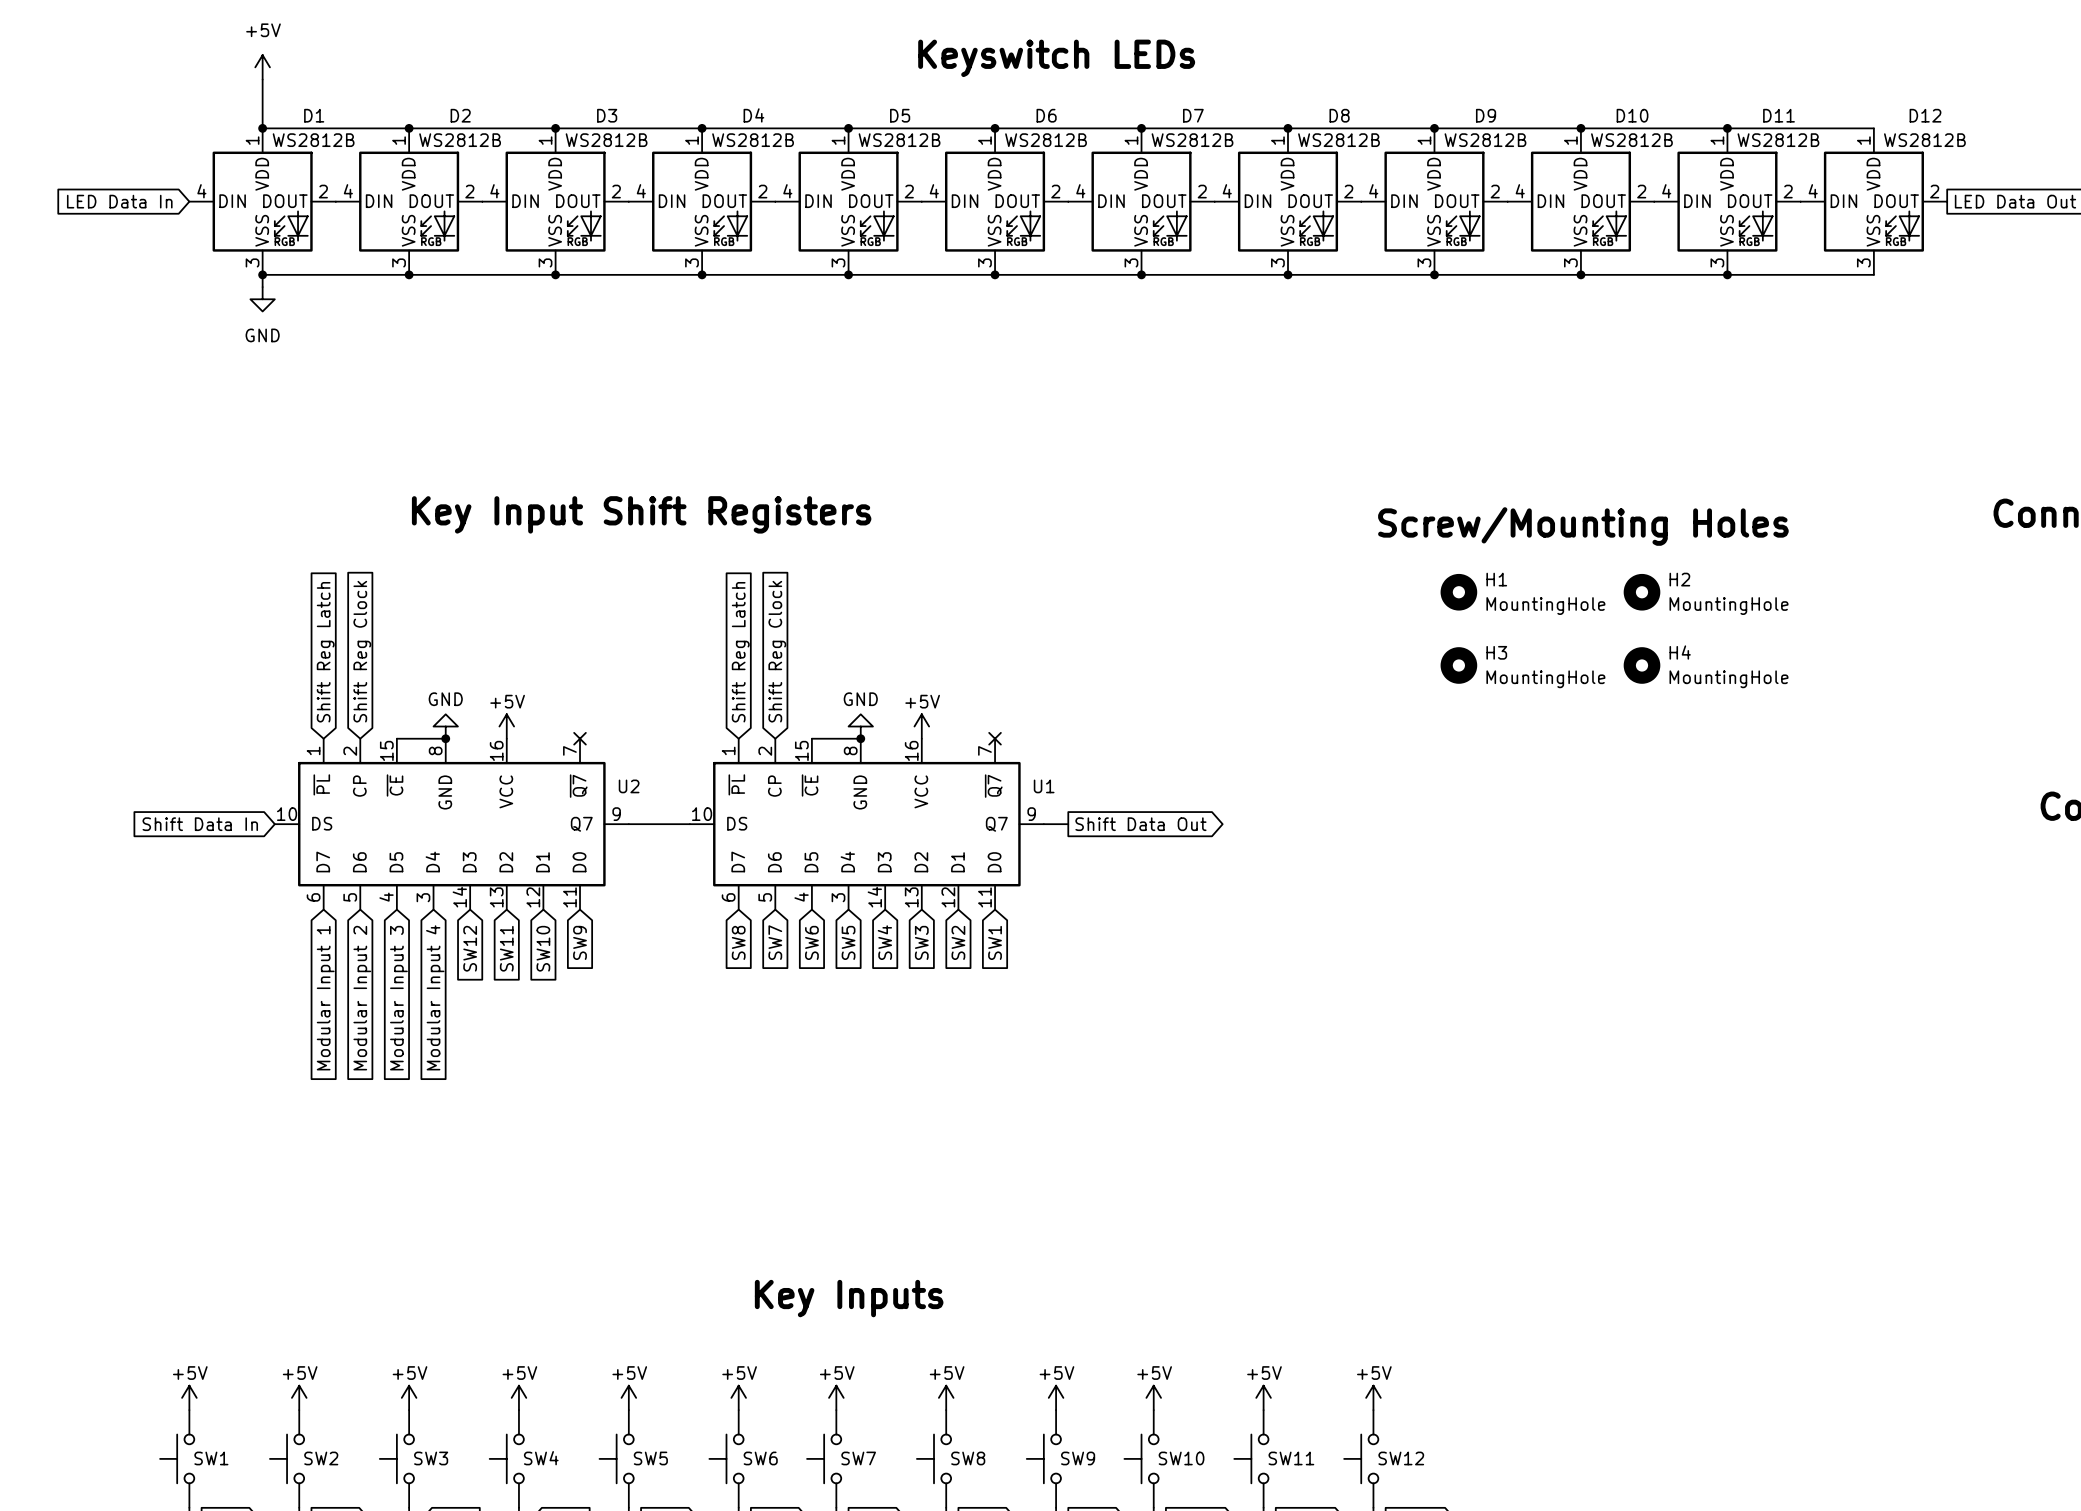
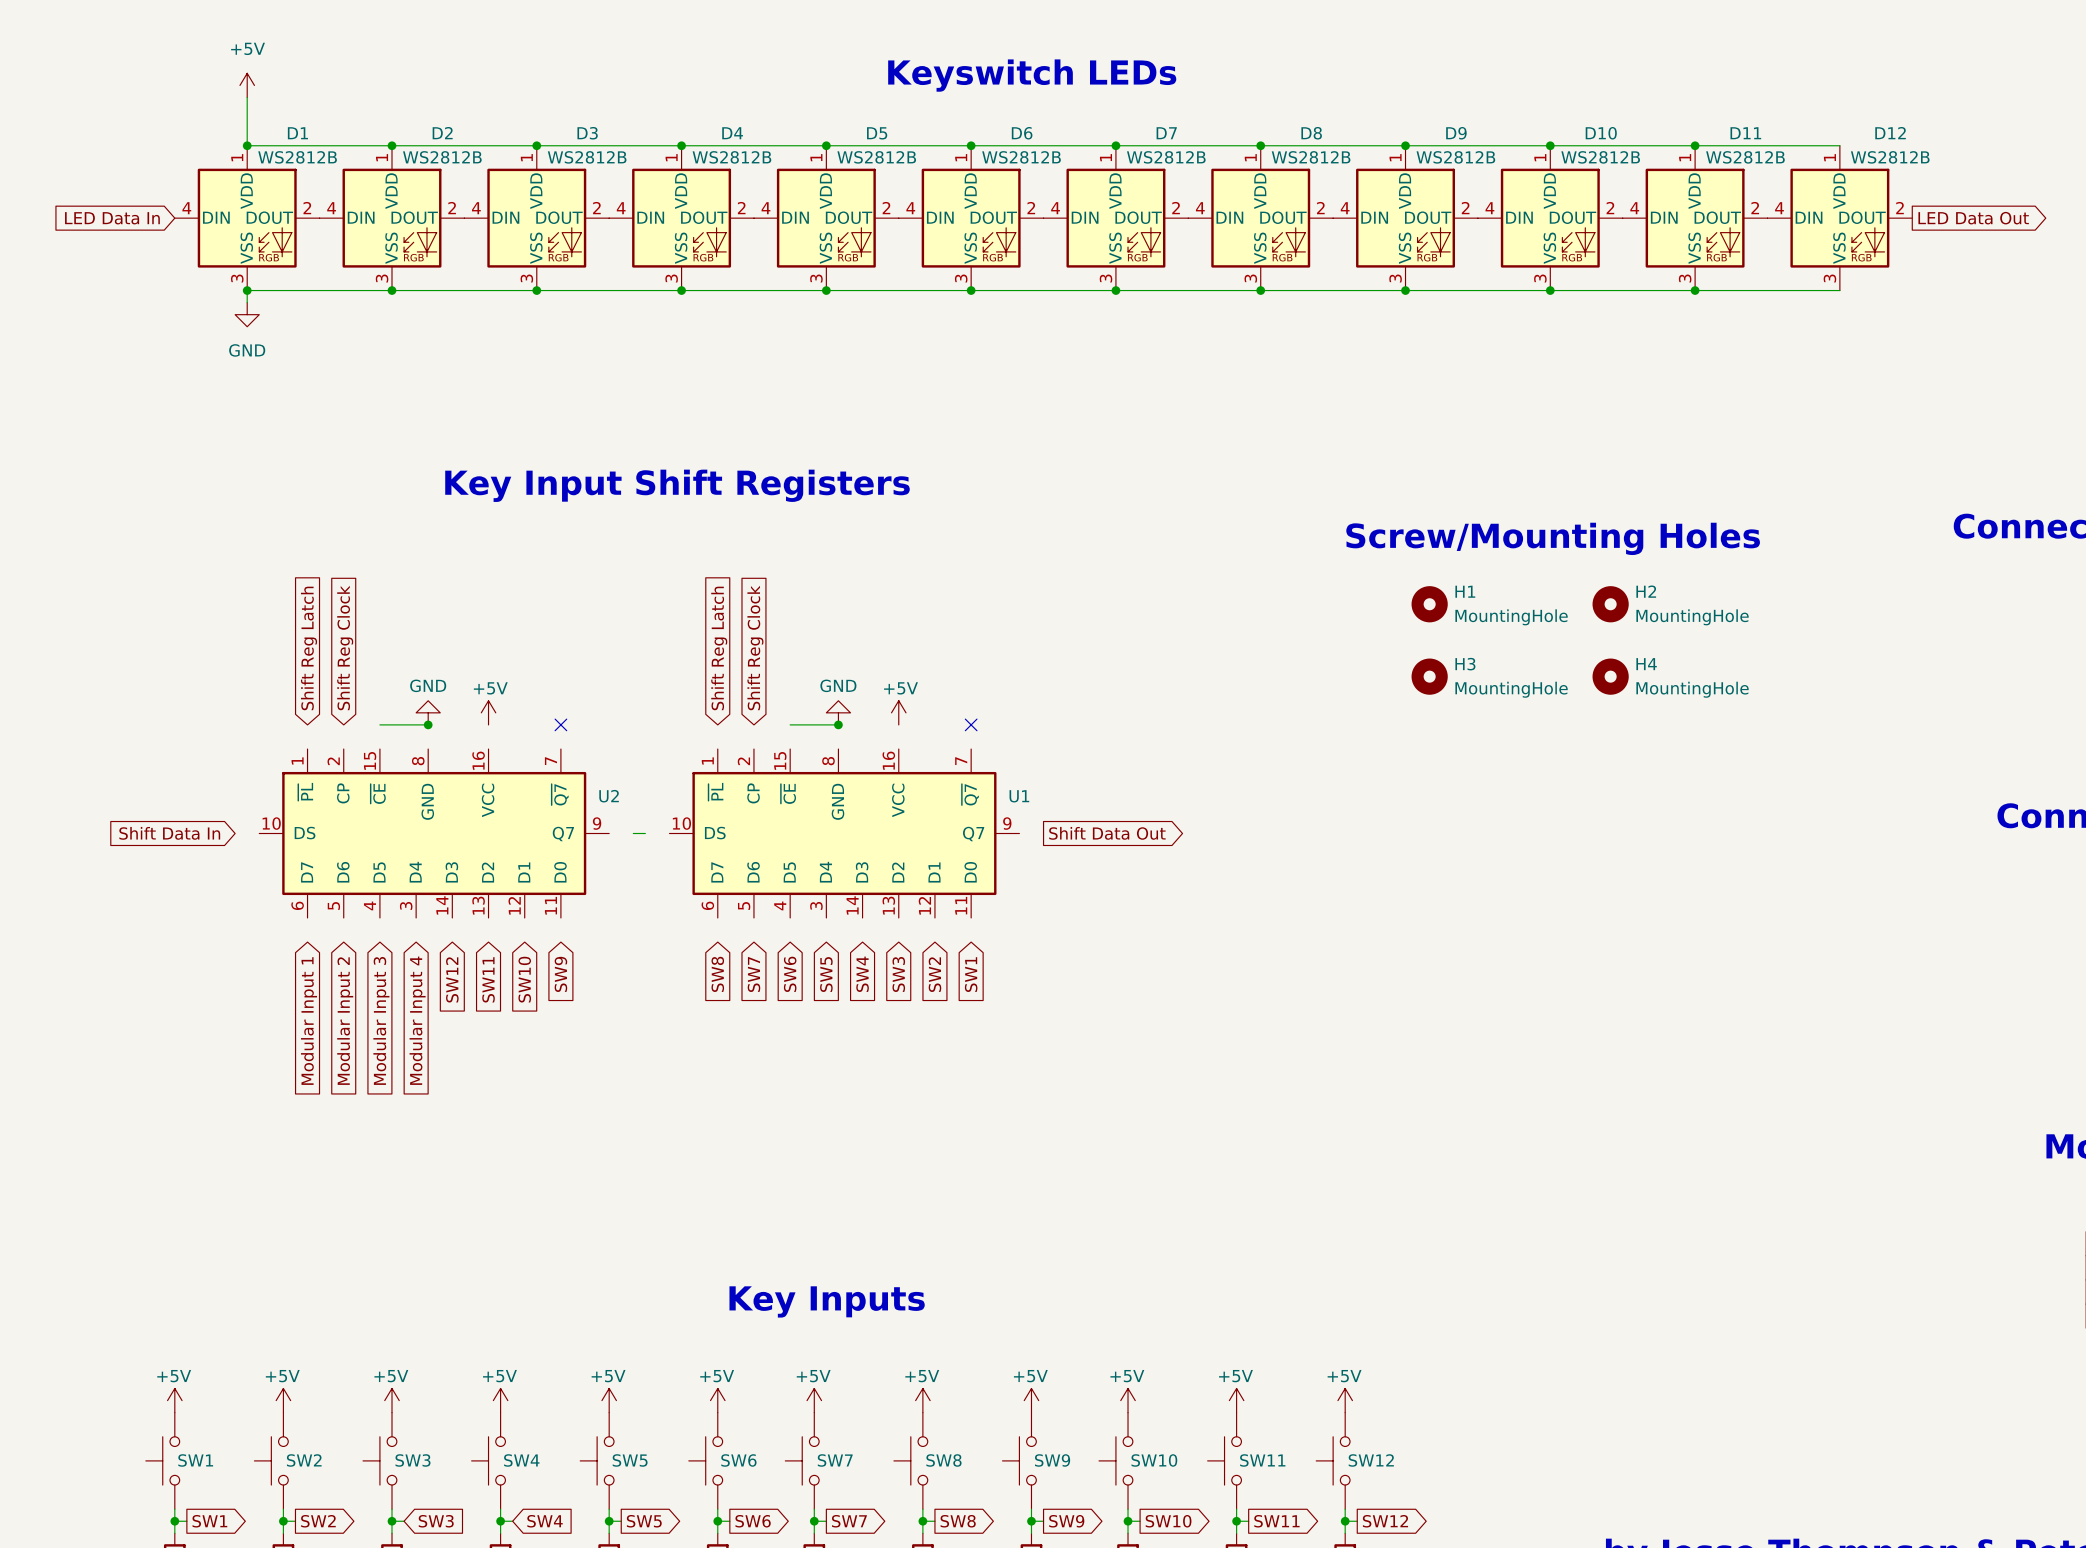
text position: Key Input Shift Registers (641, 514) -> Key Input Shift Registers (677, 485)
global label position: Shift Reg Clock (362, 651) -> Shift Reg Clock (345, 648)
global label position: Shift Reg Clock (777, 651) -> Shift Reg Clock (755, 648)
global label position: Shift Reg Latch (325, 652) -> Shift Reg Latch (309, 648)
global label position: Shift Reg Latch (740, 652) -> Shift Reg Latch (719, 648)
power symbol position: GND (445, 726) -> GND (428, 712)
power symbol position: +5V (506, 726) -> +5V (488, 712)
power symbol position: GND (860, 726) -> GND (838, 712)
power symbol position: +5V (921, 726) -> +5V (898, 712)
wire: (396, 738) (445, 738) -> (379, 724) (428, 724)
junction position: (445, 738) -> (428, 724)
no-connect mark position: (580, 738) -> (560, 724)
wire: (811, 738) (860, 738) -> (790, 724) (838, 724)
junction position: (860, 738) -> (838, 724)
no-connect mark position: (995, 738) -> (971, 724)
global label position: Shift Data In (200, 824) -> Shift Data In (169, 833)
wire: (628, 824) (653, 824) -> none
wire: (665, 824) (689, 824) -> none
wire: (1043, 824) (1068, 824) -> none
global label position: SW9 (580, 942) -> SW9 (560, 974)
global label position: SW8 (738, 942) -> SW8 (717, 974)
global label position: SW7 (775, 942) -> SW7 (753, 974)
global label position: SW6 (811, 942) -> SW6 (790, 974)
global label position: SW5 (848, 942) -> SW5 (826, 974)
global label position: SW4 (884, 942) -> SW4 (862, 974)
global label position: SW3 (921, 942) -> SW3 (898, 974)
global label position: SW2 (958, 942) -> SW2 (934, 974)
global label position: SW1 (995, 942) -> SW1 (971, 974)
global label position: SW12 (470, 948) -> SW12 (452, 979)
global label position: SW11 (506, 948) -> SW11 (488, 979)
global label position: SW10 (543, 948) -> SW10 (524, 979)
global label position: Modular Input 4 (435, 997) -> Modular Input 4 (417, 1020)
global label position: Modular Input 1 (325, 998) -> Modular Input 1 (309, 1021)
global label position: Modular Input 2 (362, 998) -> Modular Input 2 (345, 1021)
global label position: Modular Input 3 (398, 998) -> Modular Input 3 (381, 1020)

